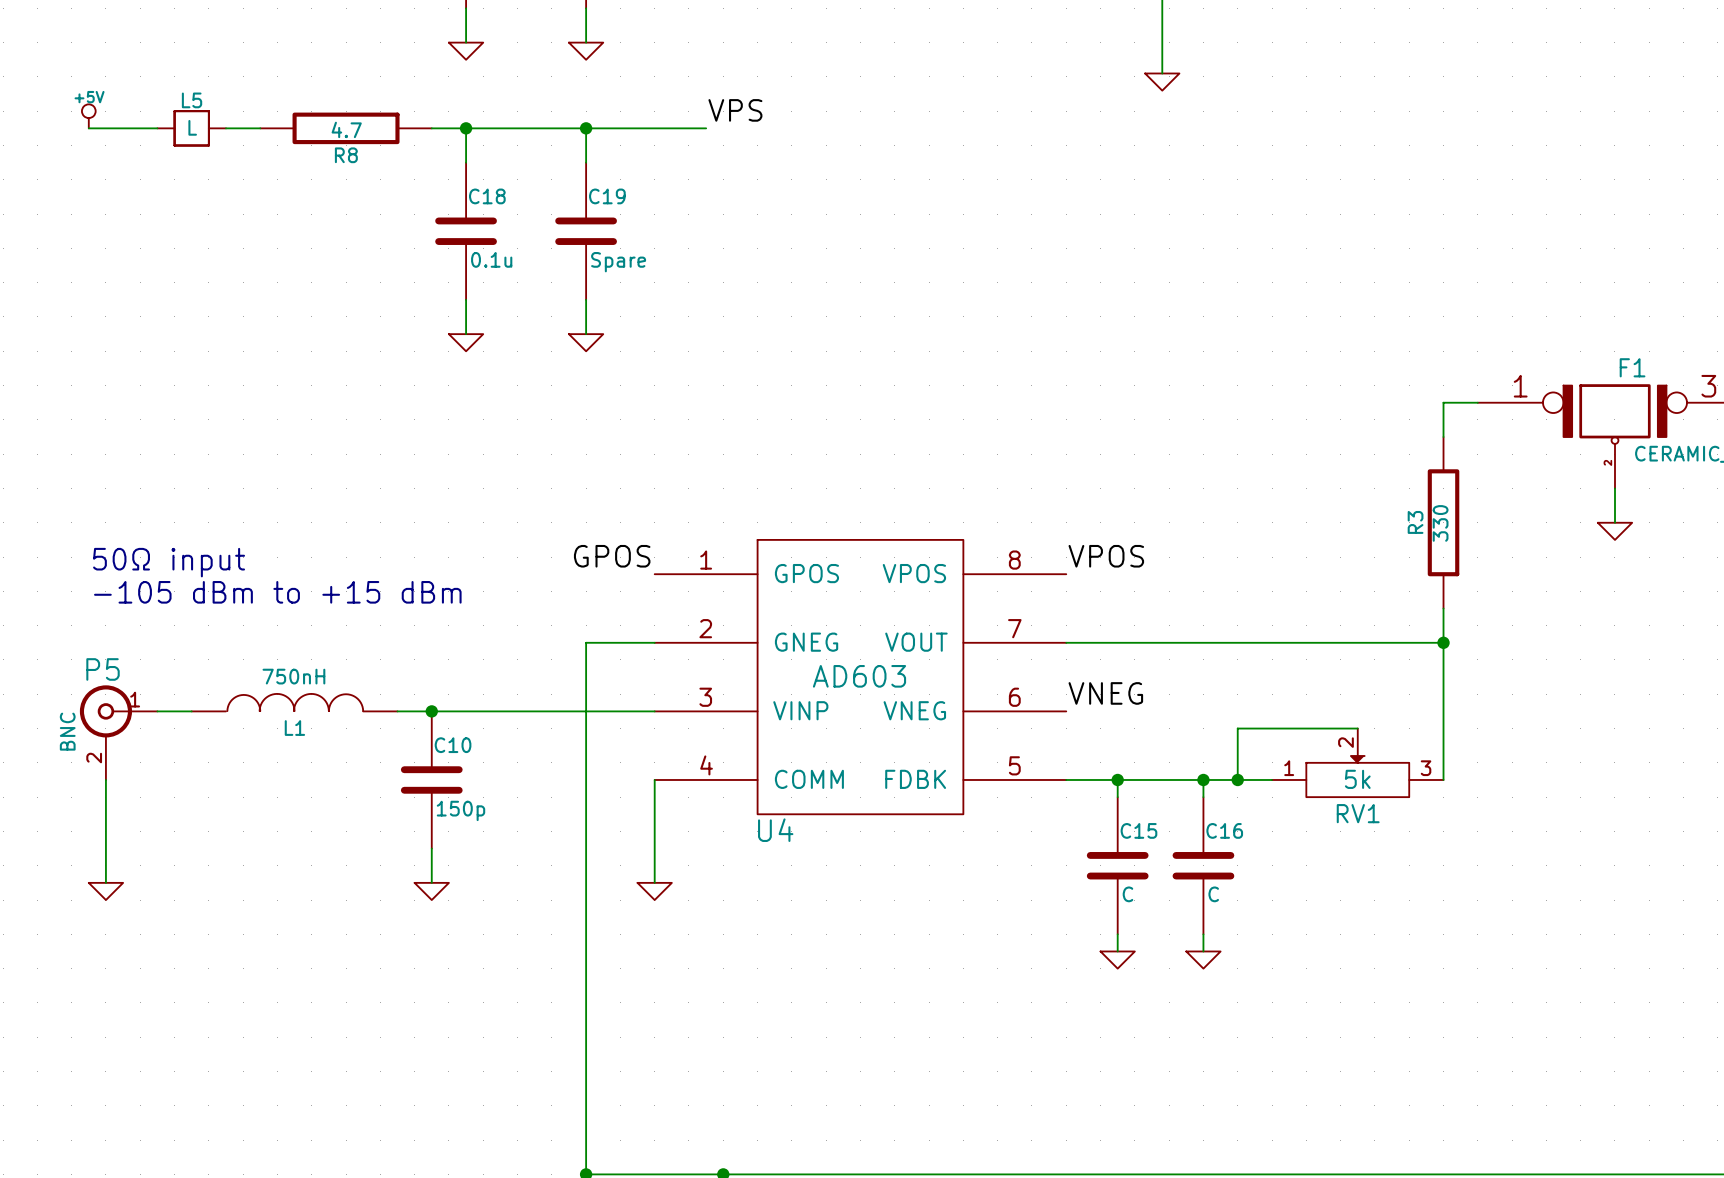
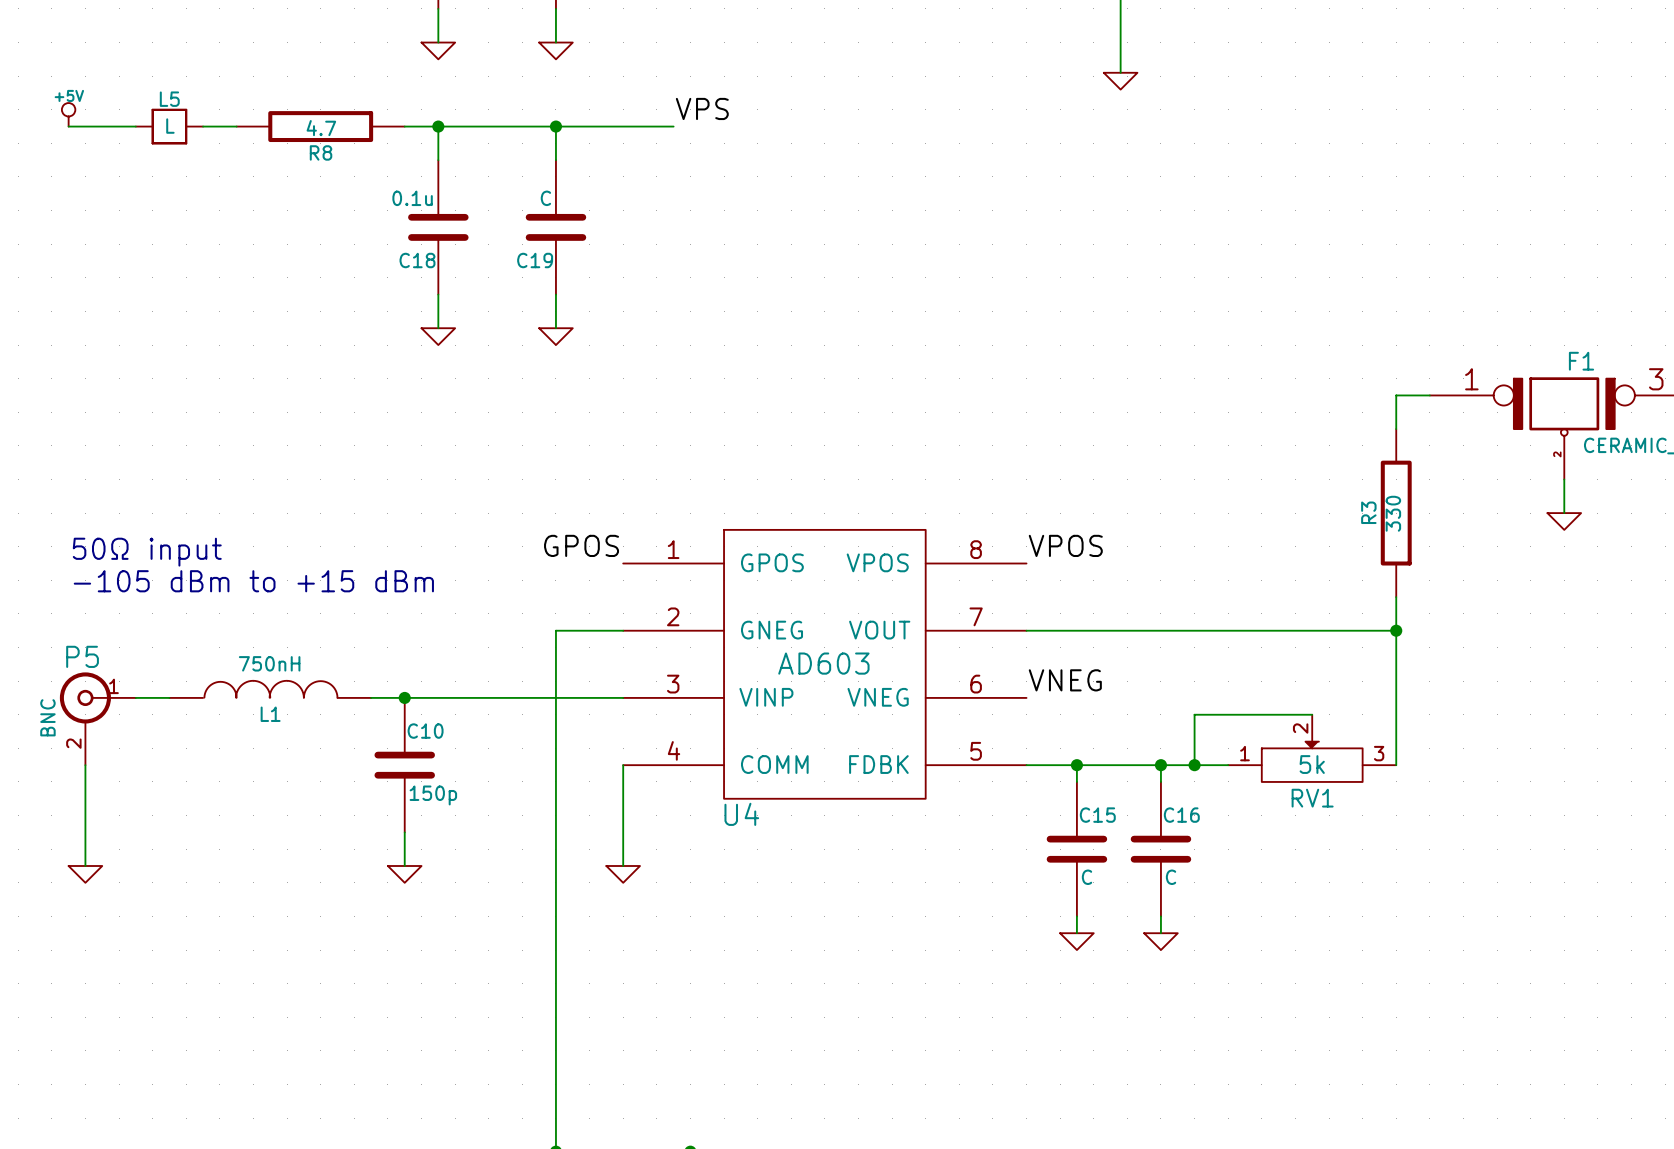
C18 name position: C18 (487, 196) -> C18 (417, 260)
C19 name position: C19 (607, 196) -> C19 (535, 260)
C18 value position: 0.1u (491, 259) -> 0.1u (412, 198)
C19 value: Spare (618, 262) -> C (545, 198)

